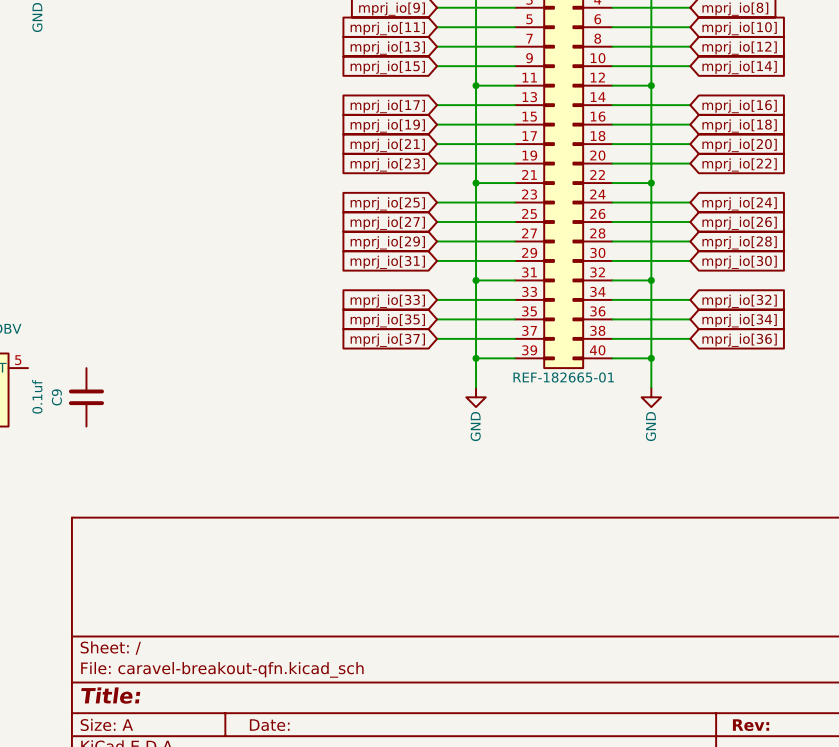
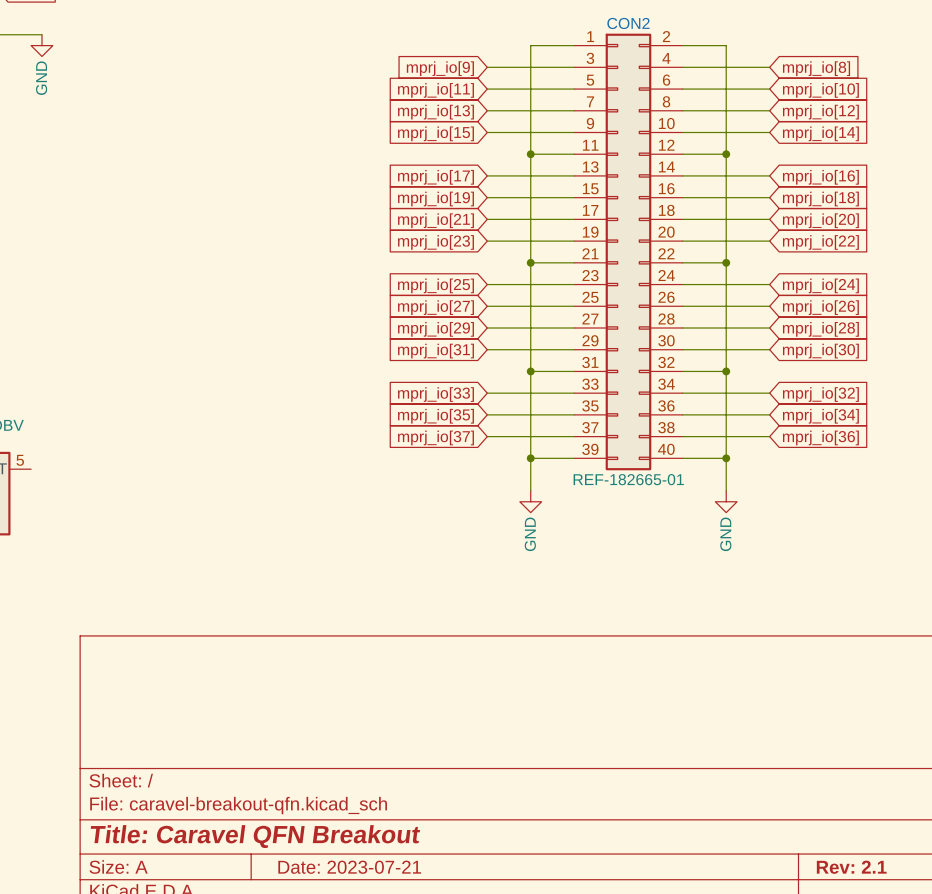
C9: 0.1uf (86, 397) -> none
title block: Title: (110, 695) -> Title: Caravel QFN Breakout (255, 836)
title block: Date: (269, 725) -> Date: 2023-07-21 (349, 867)
title block: Rev: (751, 725) -> Rev: 2.1 (851, 867)

